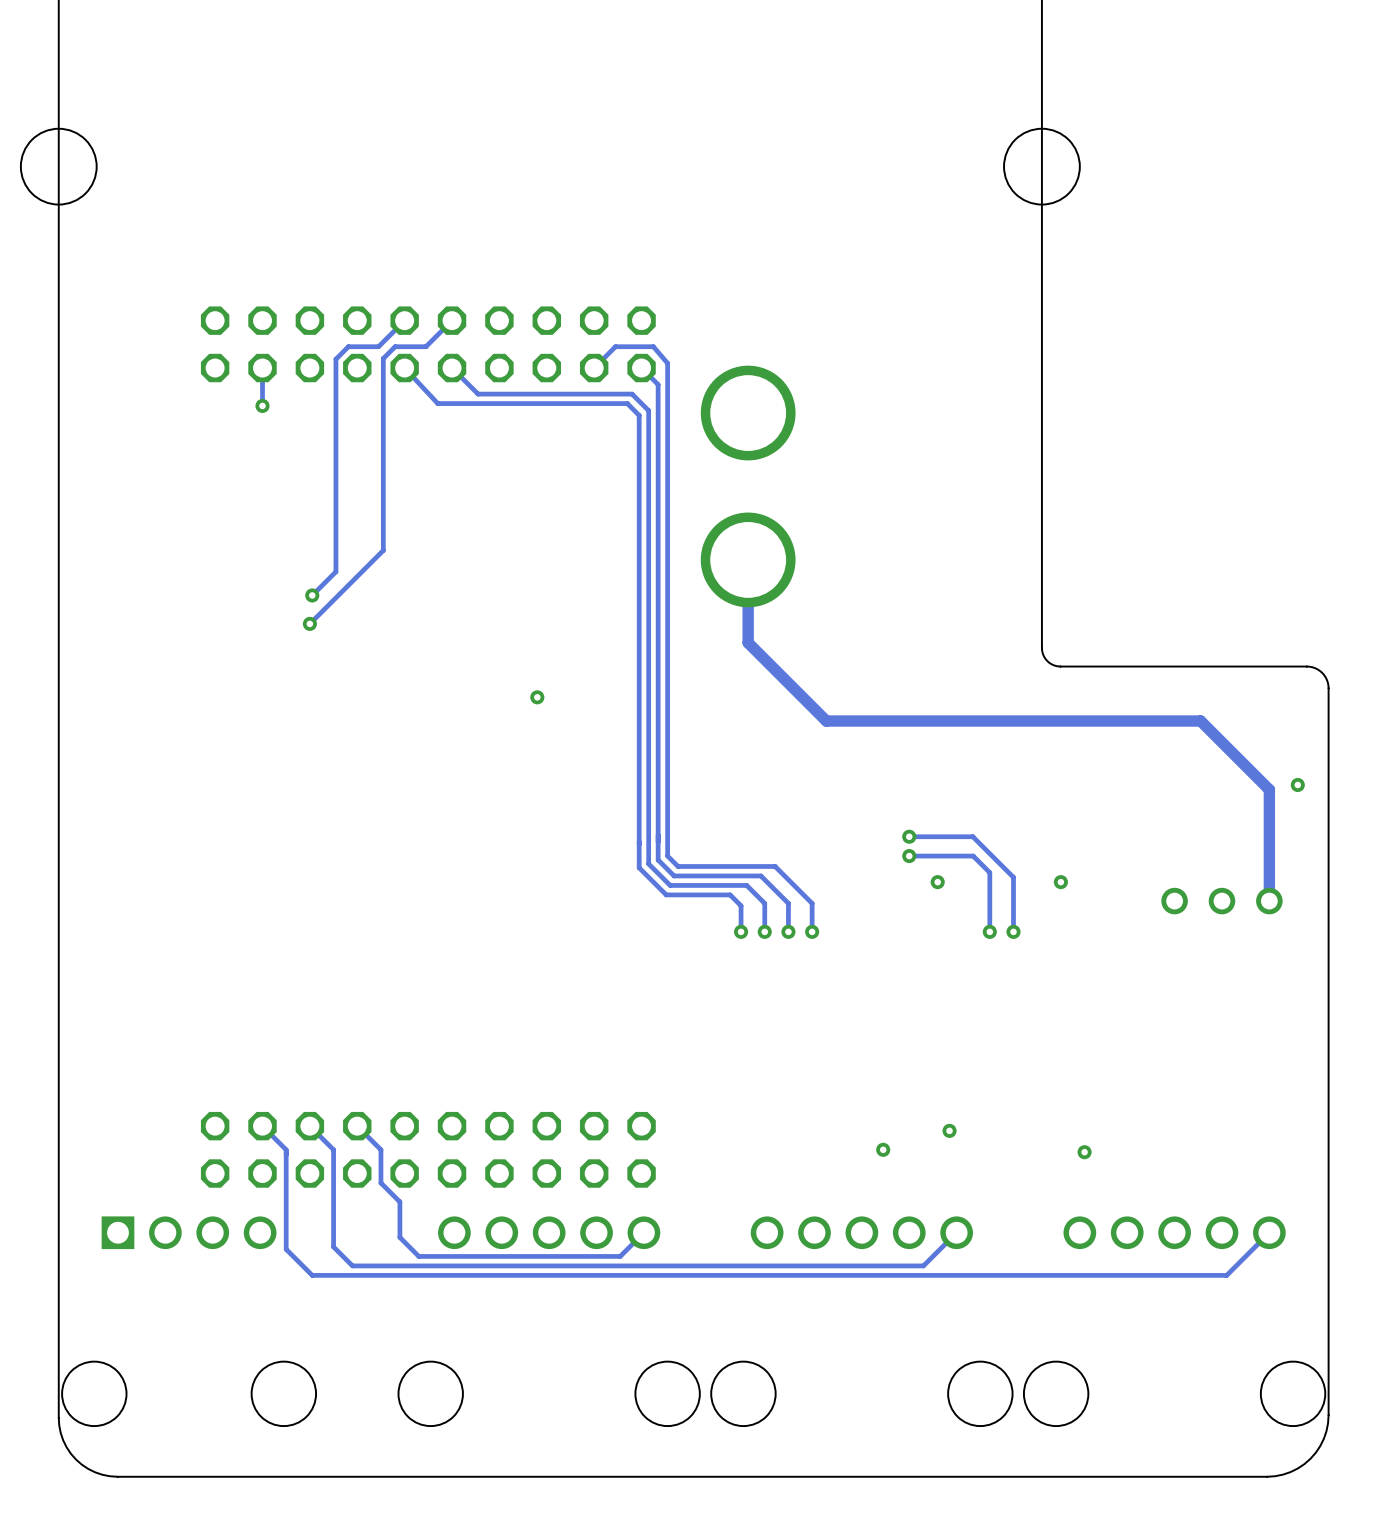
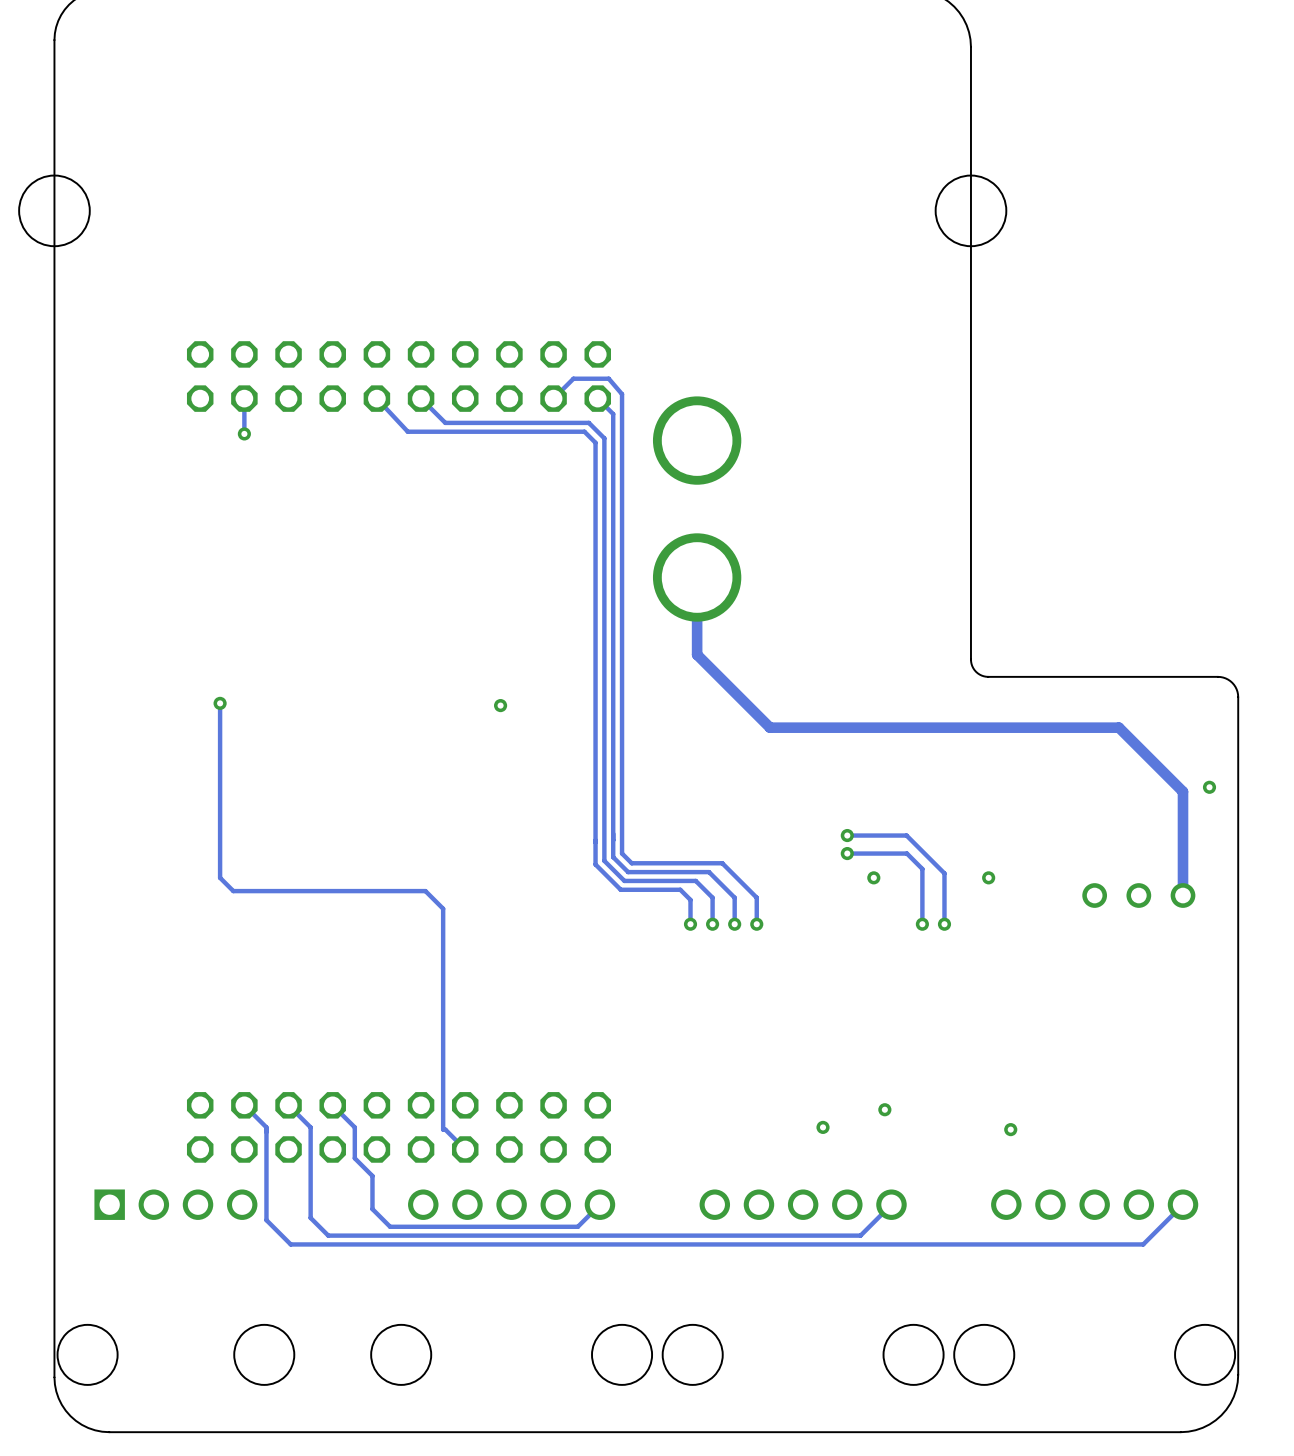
track: (404, 320) (378, 346) (348, 346) (335, 359) (335, 571) (312, 595) -> none
track: (452, 320) (425, 346) (395, 346) (383, 358) (383, 550) (309, 623) -> none
via: (312, 595) -> none
via: (309, 623) -> none
track: none -> (220, 703) (220, 877) (233, 891) (425, 891) (443, 908) (443, 1129) (465, 1149)
via: none -> (220, 703)

